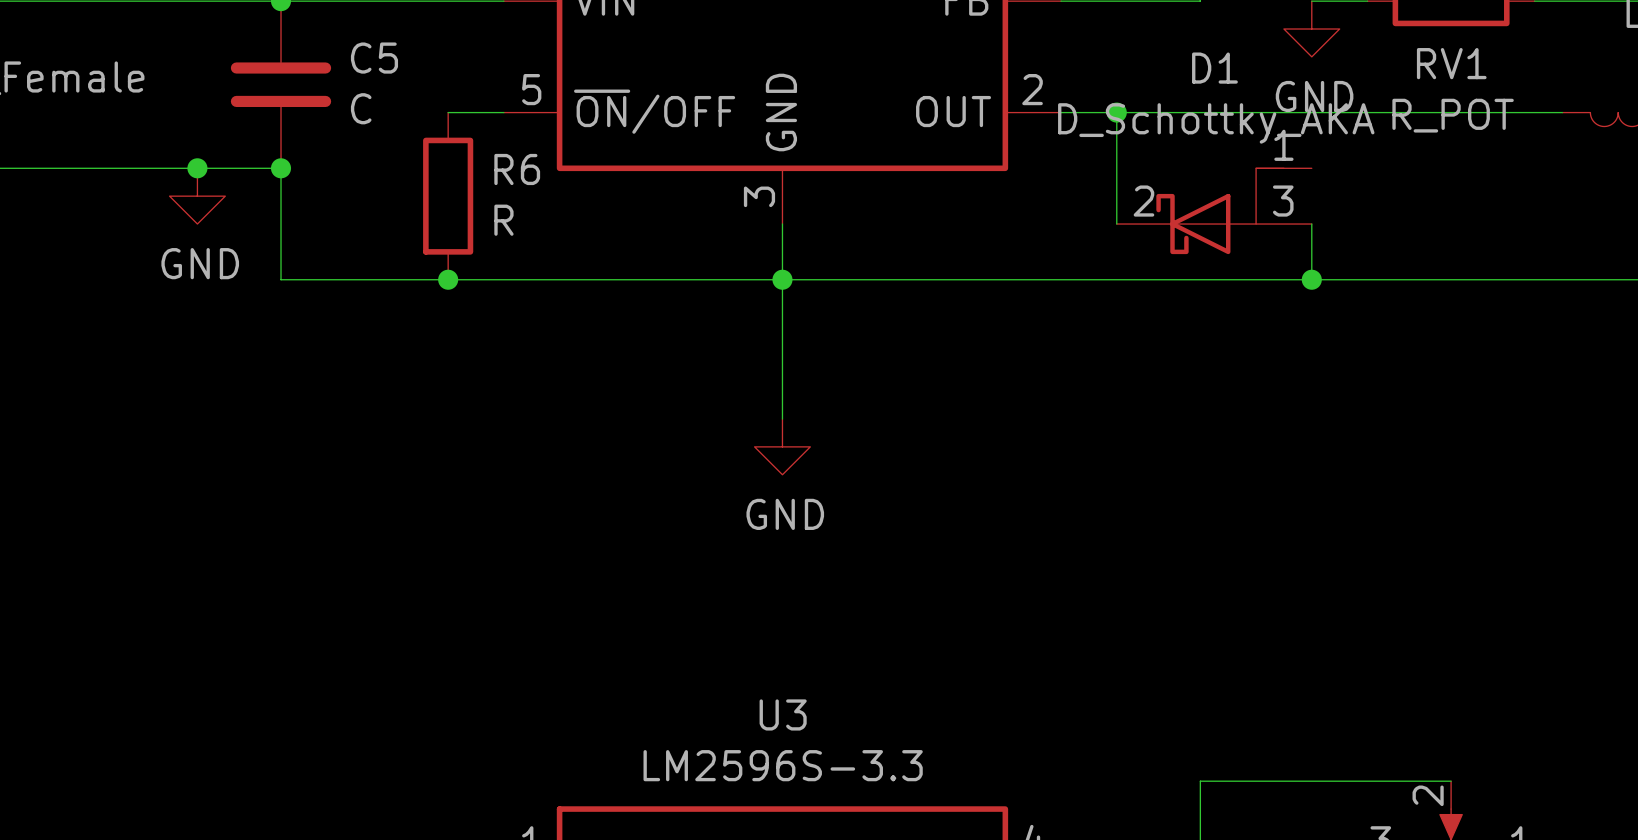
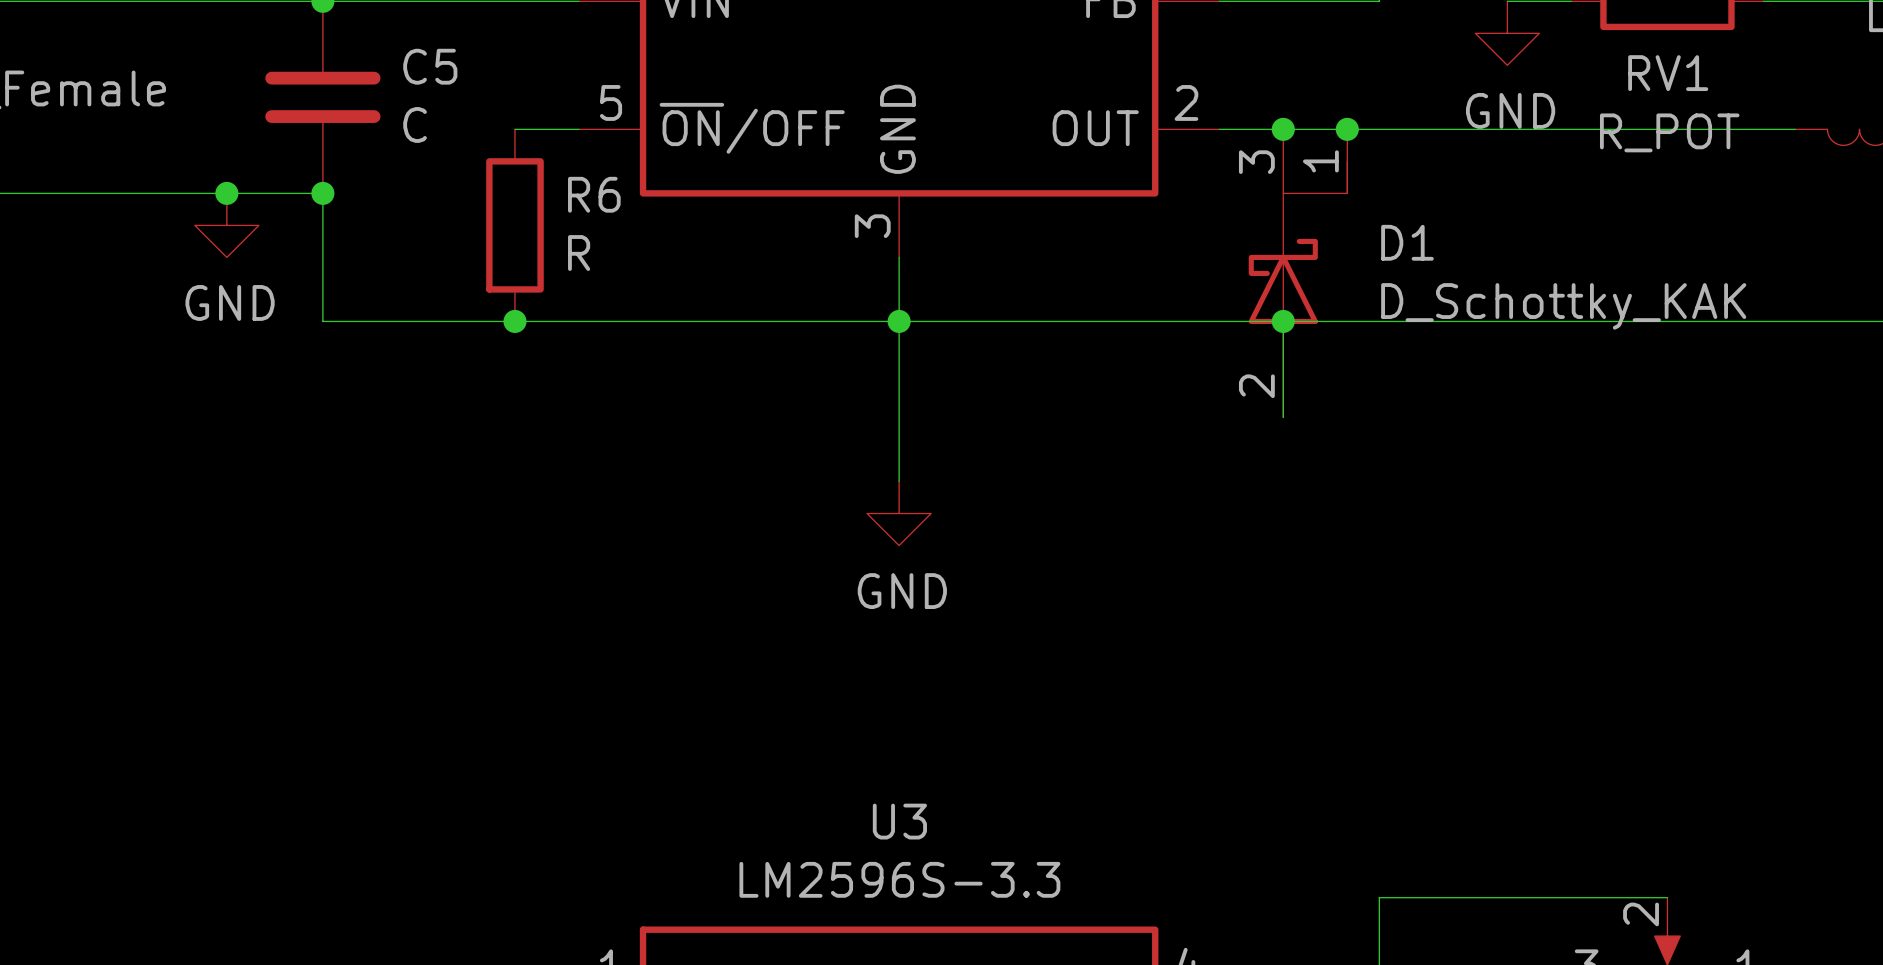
D1 name position: D1 (1214, 68) -> D1 (1407, 242)
junction: none -> (1347, 129)
D1 value: D_Schottky_AKA (1216, 123) -> D_Schottky_KAK (1563, 306)
D1 symbol: [1116, 168, 1312, 255] -> [1248, 129, 1348, 418]
wire: (1311, 224) (1311, 279) -> none
wire: none -> (1283, 321) (1283, 417)
junction: none -> (1283, 321)
junction: (1311, 279) -> none

